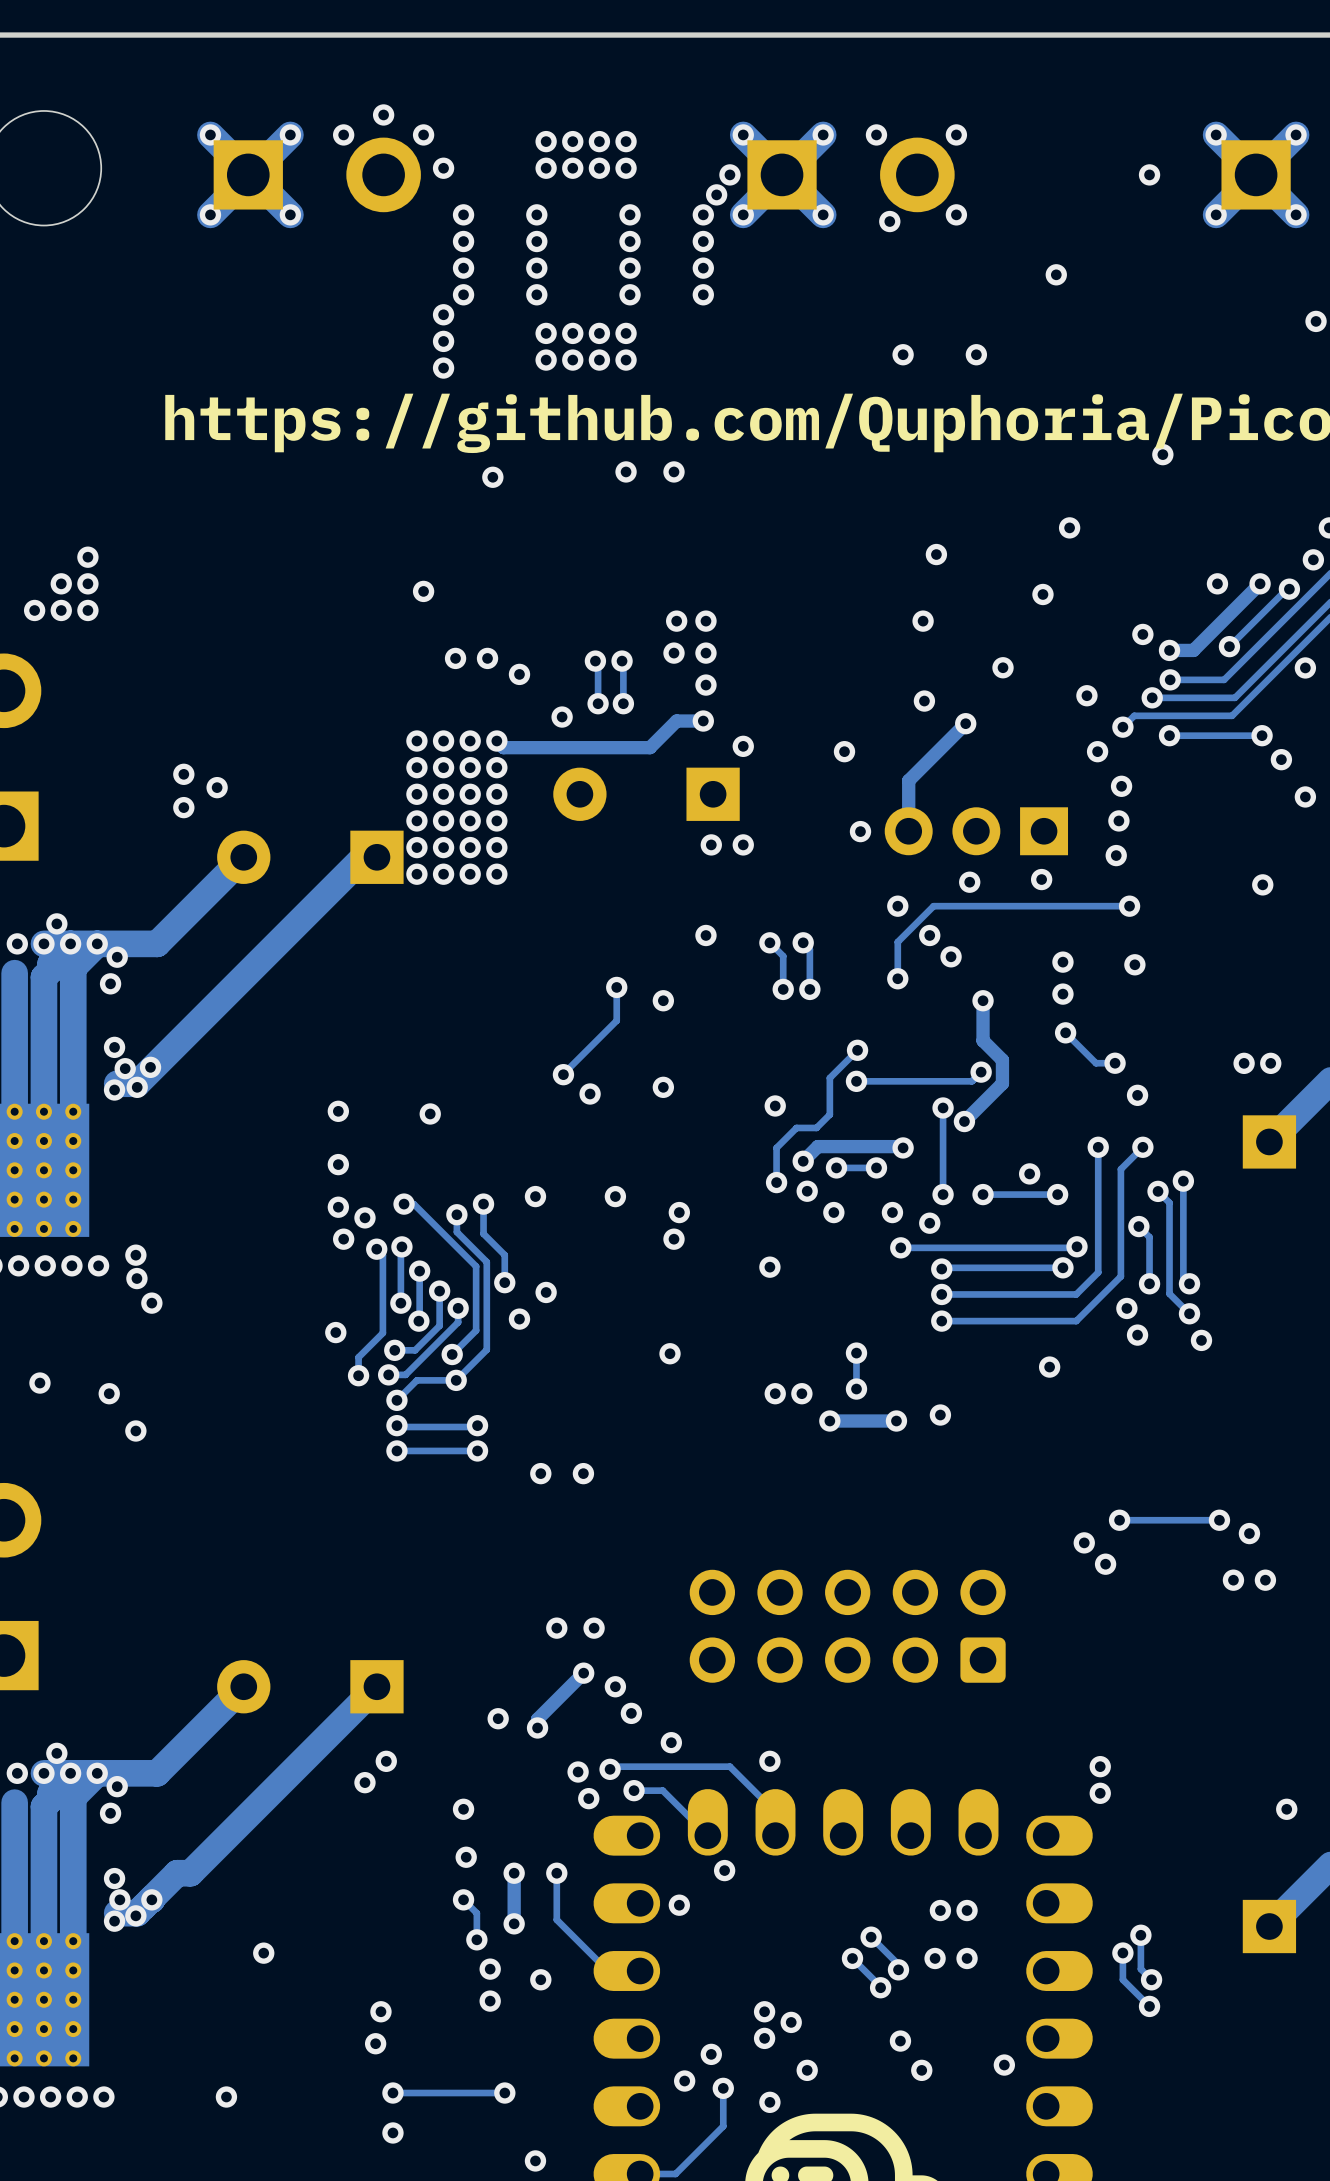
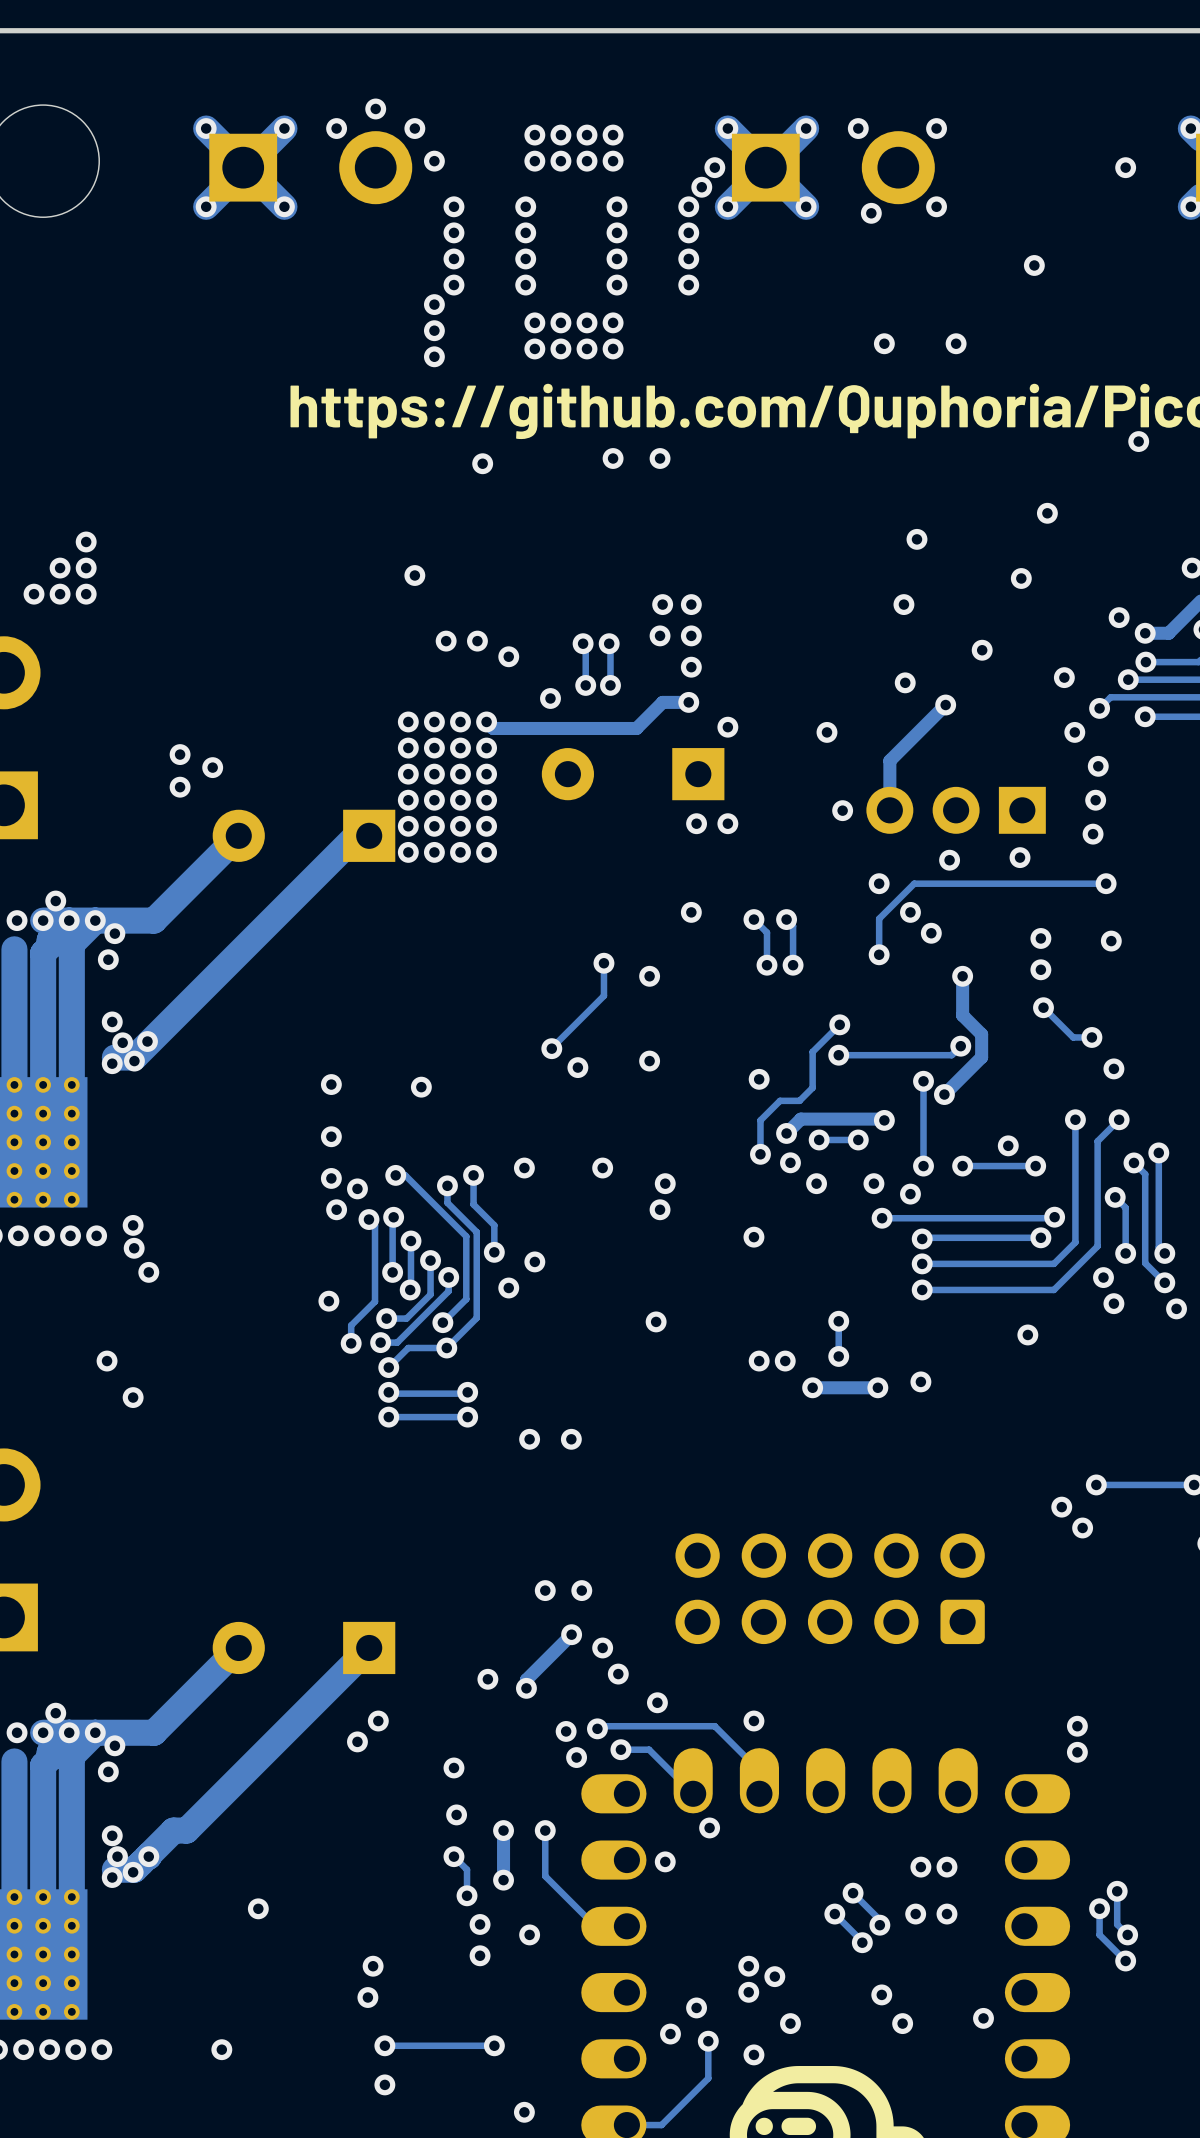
via: (39, 1383) -> none

